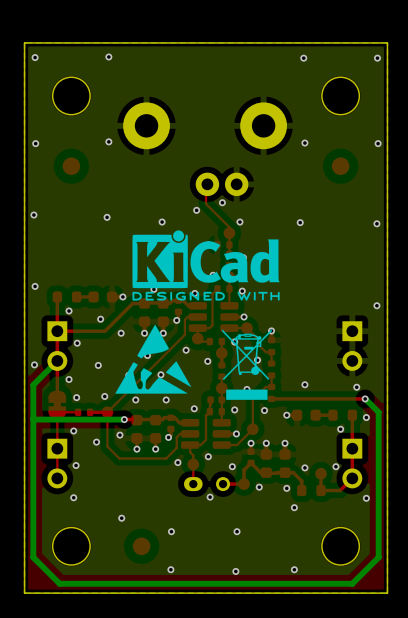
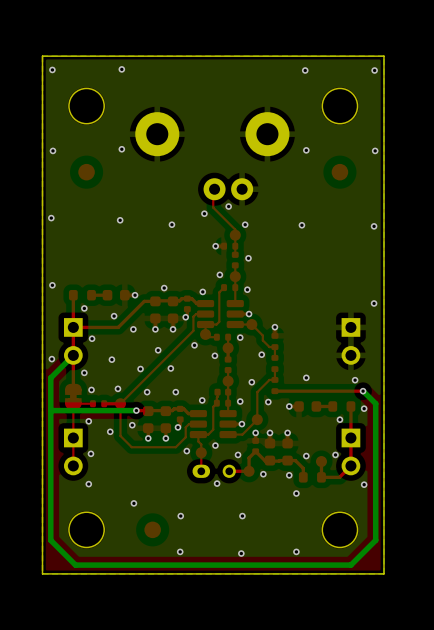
drawing: [132, 230, 280, 301] -> none
drawing: [115, 324, 192, 394] -> none
drawing: [222, 329, 272, 400] -> none

